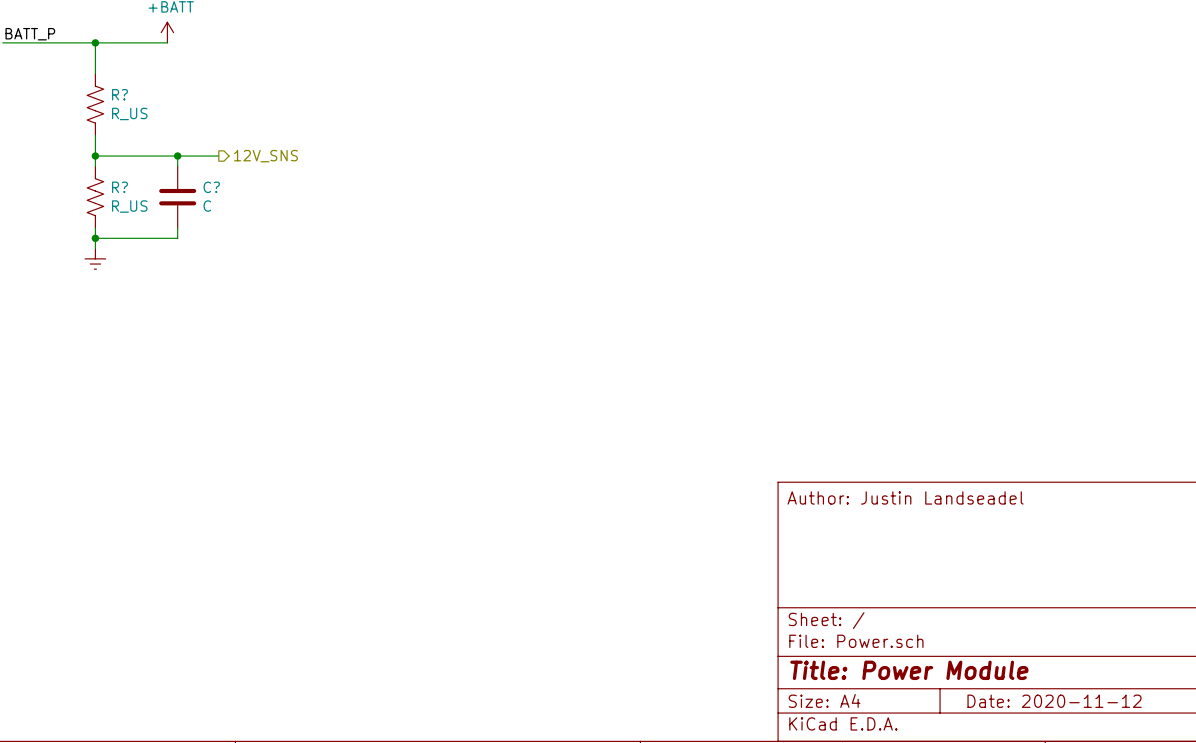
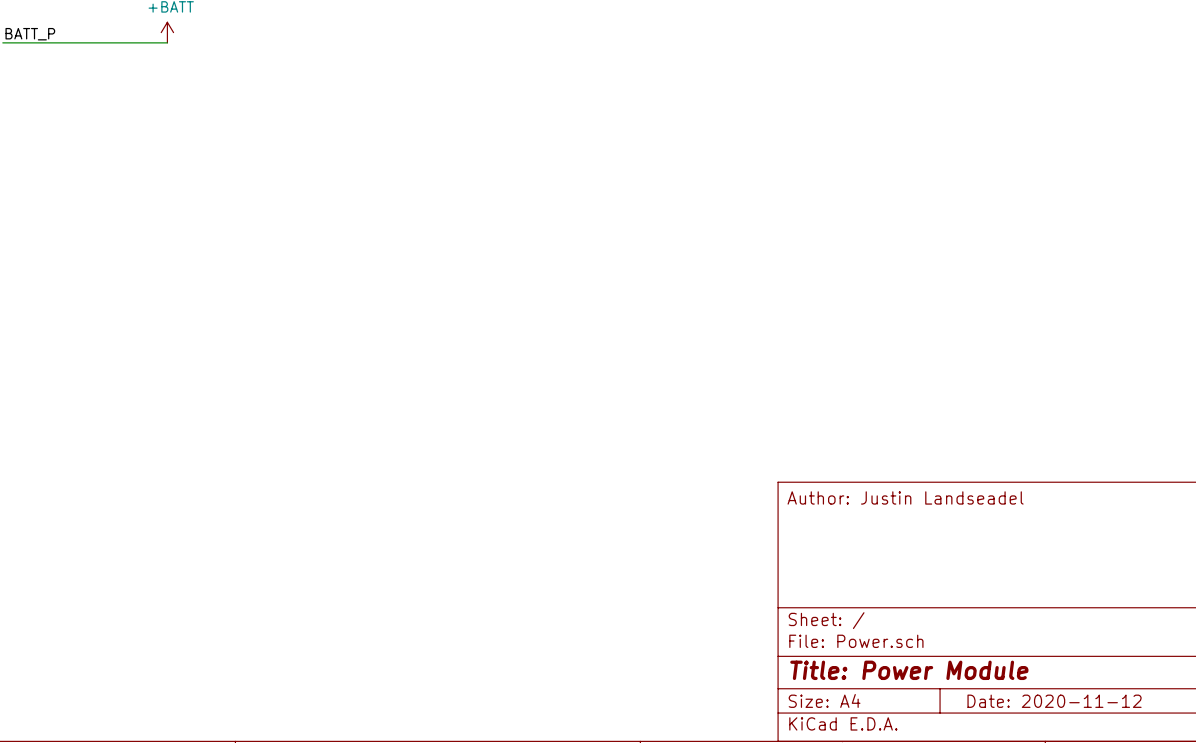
wire: (95, 42) (95, 73) -> none
junction: (95, 42) -> none
R?: R_US (95, 104) -> none
wire: (95, 135) (95, 166) -> none
wire: (95, 156) (218, 156) -> none
junction: (95, 156) -> none
wire: (177, 156) (177, 166) -> none
junction: (177, 156) -> none
hierarchical label: 12V_SNS (266, 156) -> none
R?: R_US (95, 197) -> none
C?: C (177, 197) -> none
wire: (95, 228) (95, 248) -> none
wire: (177, 228) (177, 238) (95, 238) -> none
junction: (95, 238) -> none
power symbol: (95, 258) -> none

